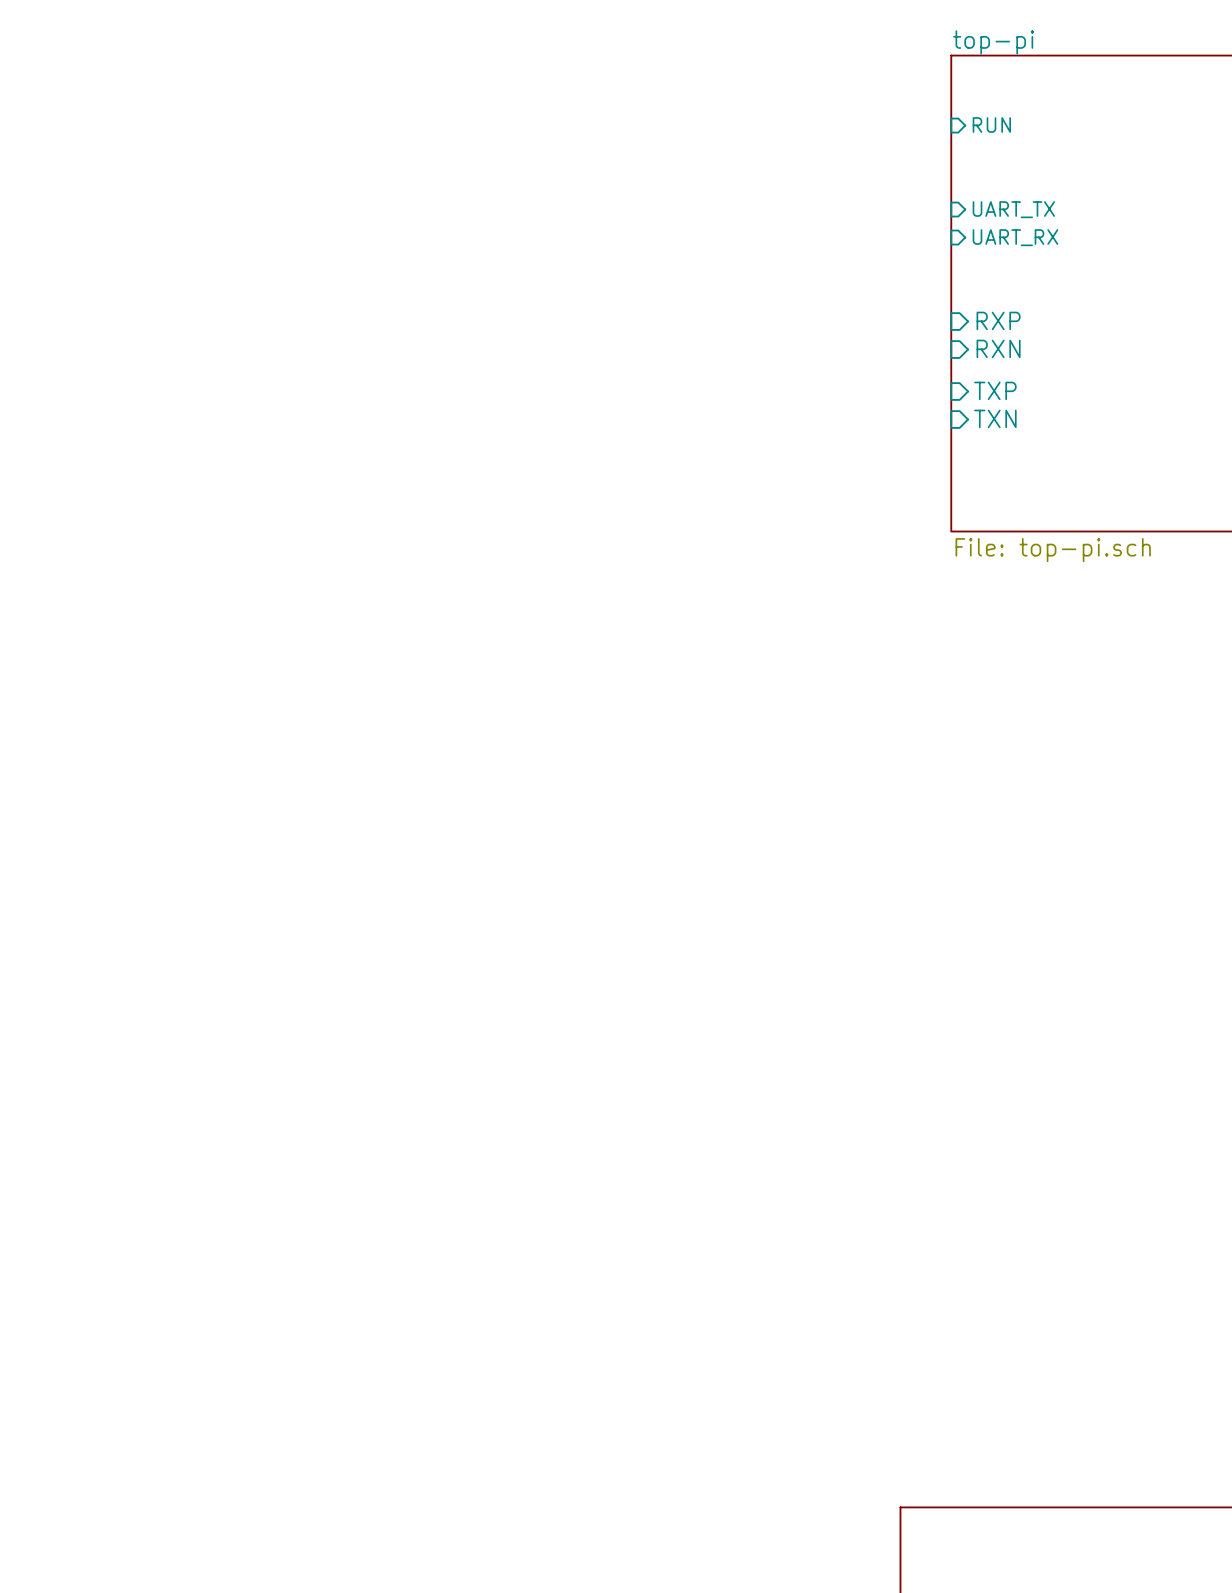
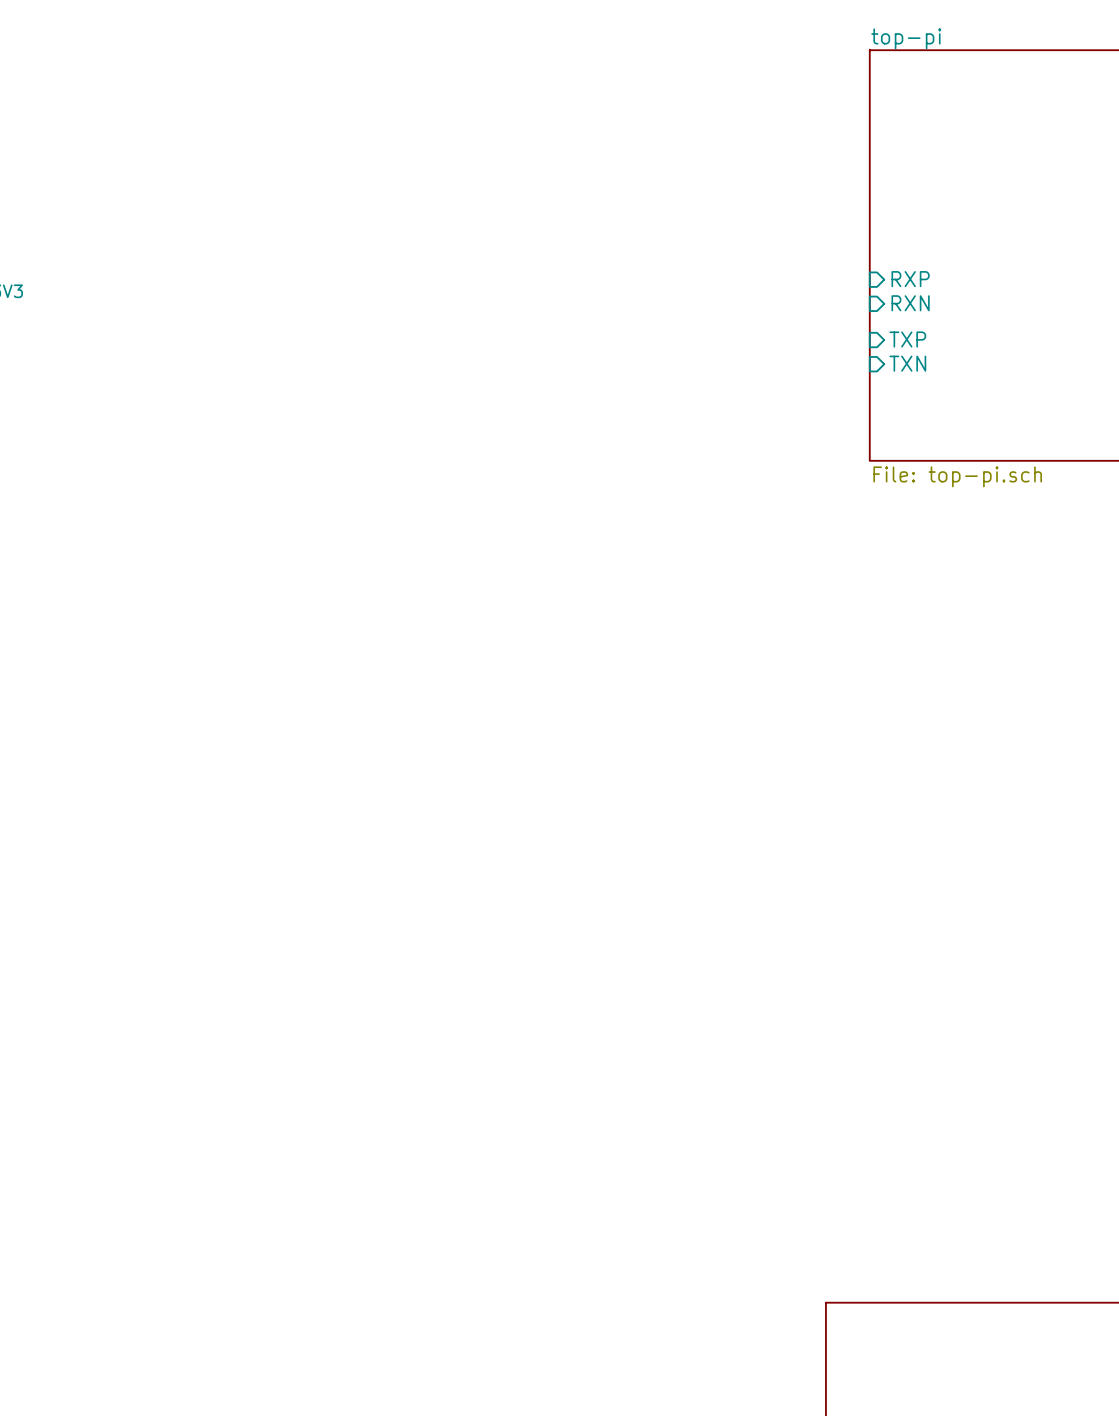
sheet pin: RUN (991, 125) -> none
sheet pin: UART_TX (1013, 209) -> none
sheet pin: UART_RX (1015, 237) -> none

